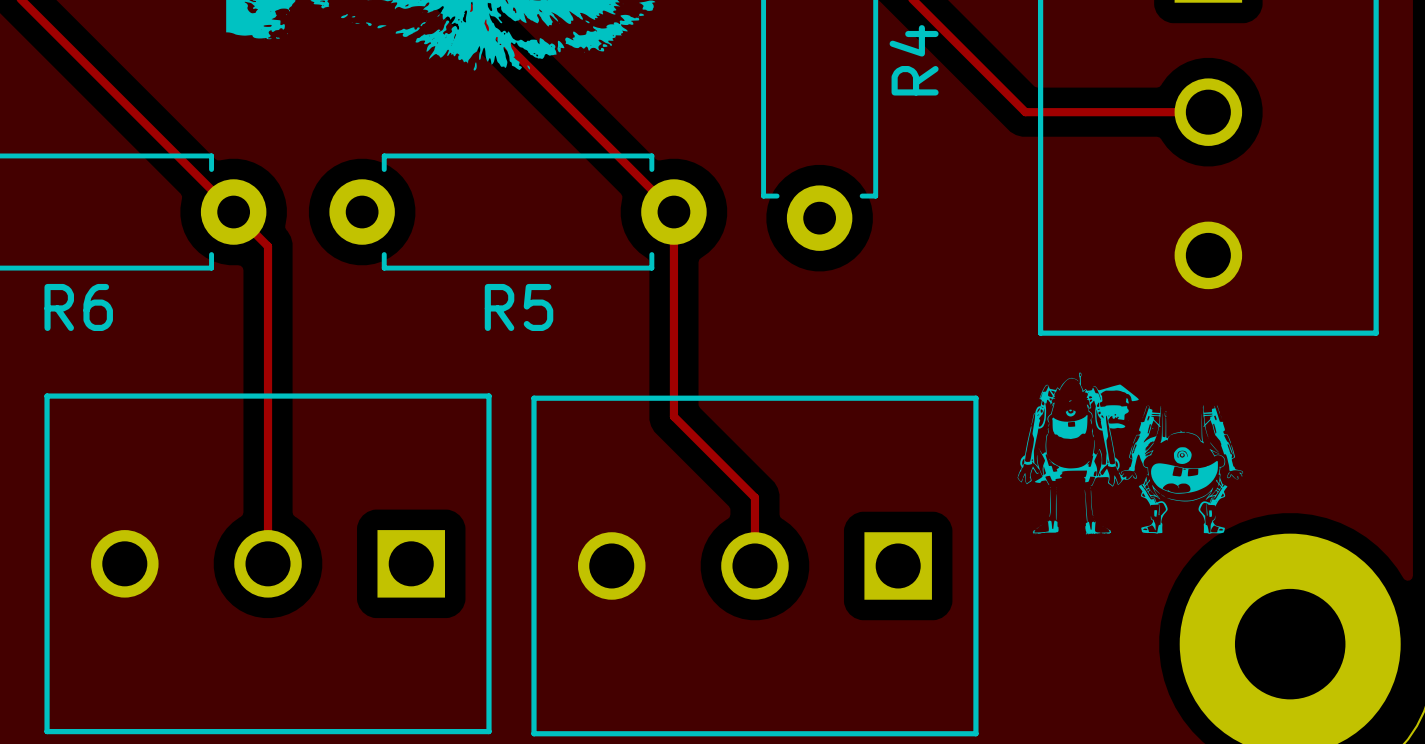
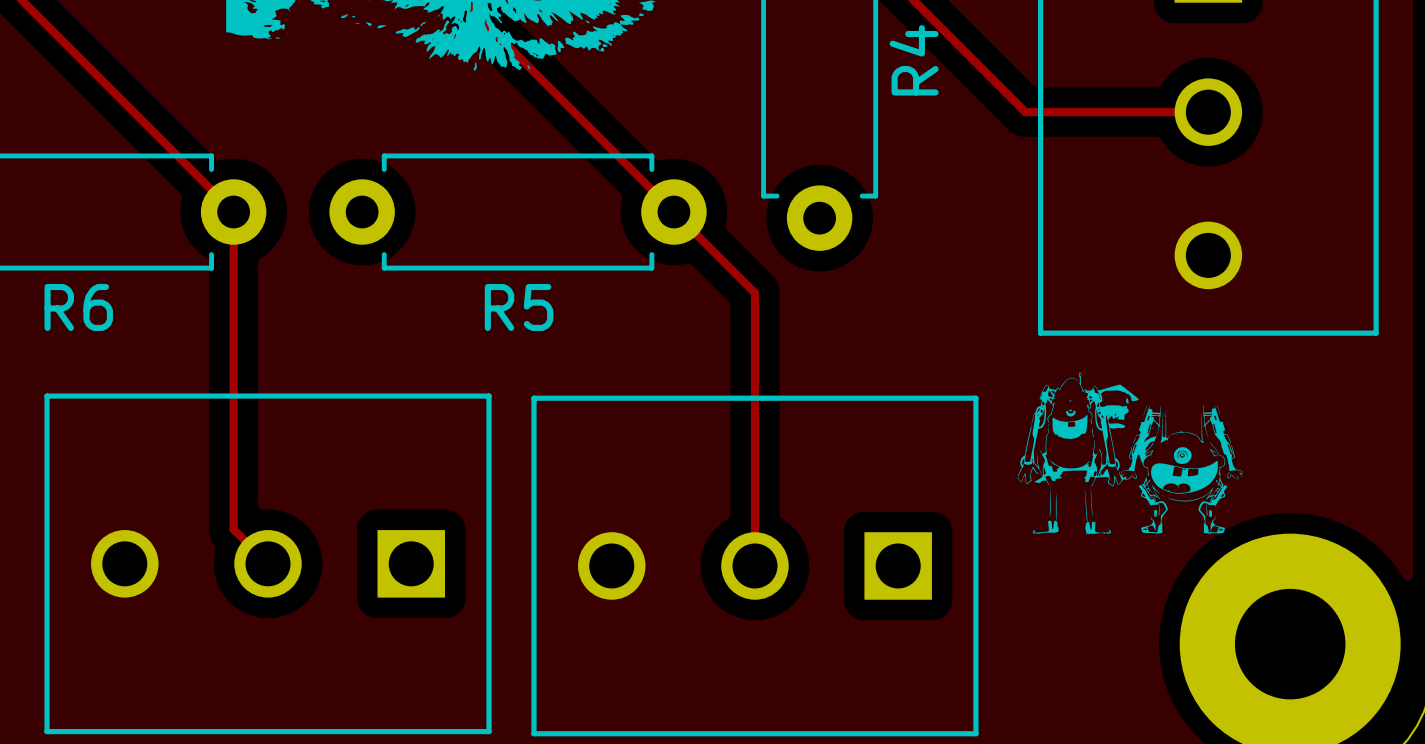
track: (233, 212) (268, 246) (268, 563) -> (233, 212) (233, 529) (268, 563)
track: (673, 212) (673, 416) (754, 497) -> (673, 212) (754, 293) (754, 497)

